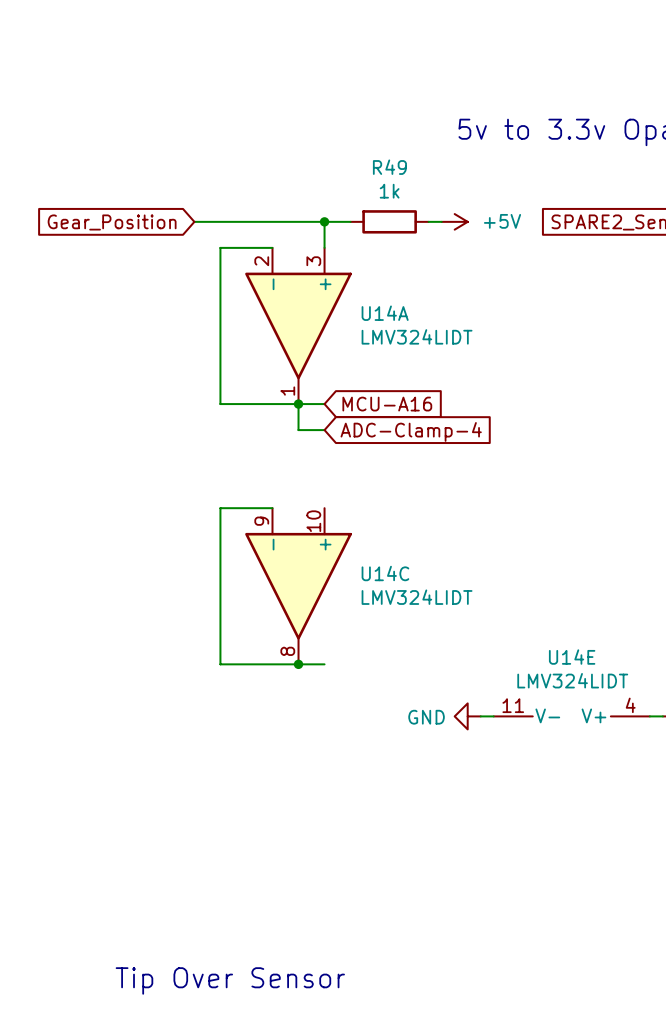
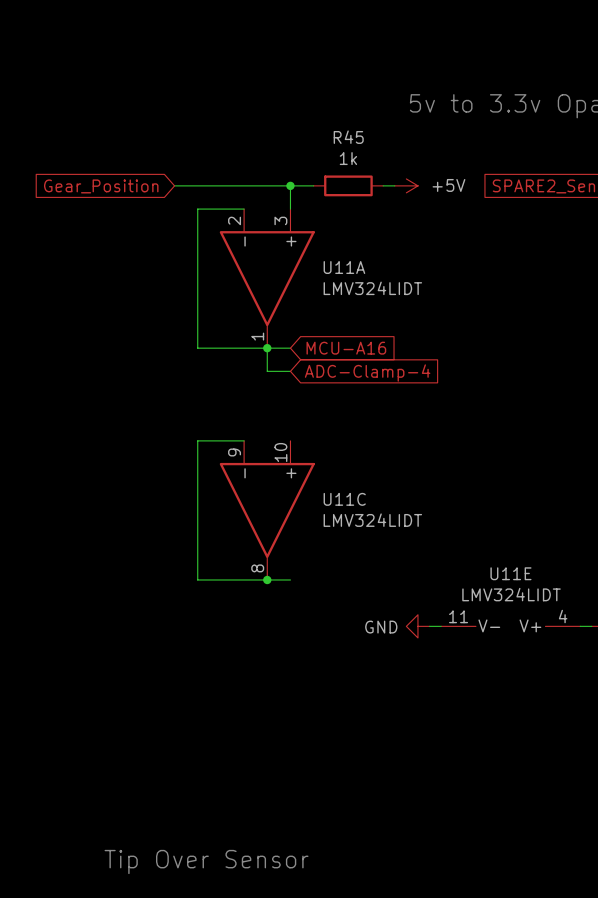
R49 name: R49 (389, 167) -> R45 (348, 137)
U14A name: U14A (385, 313) -> U11A (344, 267)
U14C name: U14C (385, 573) -> U11C (344, 499)
U14E name: U14E (572, 657) -> U11E (510, 573)

